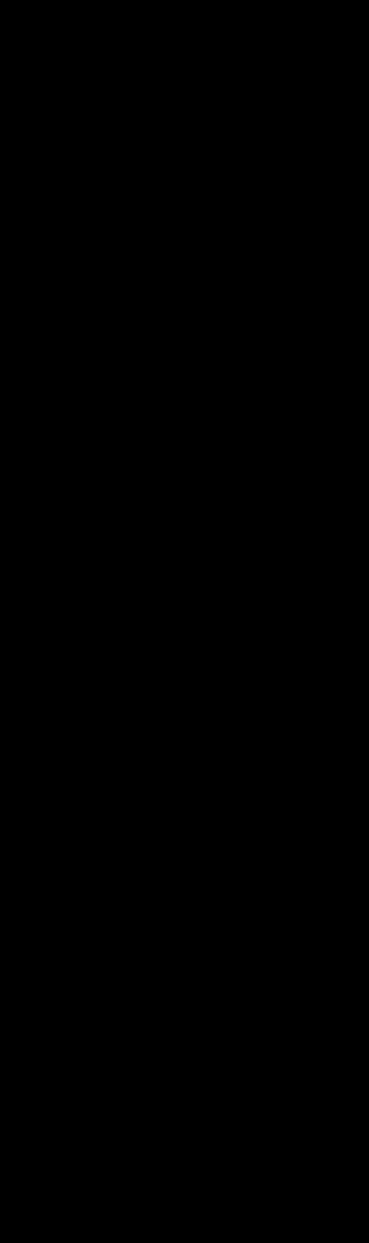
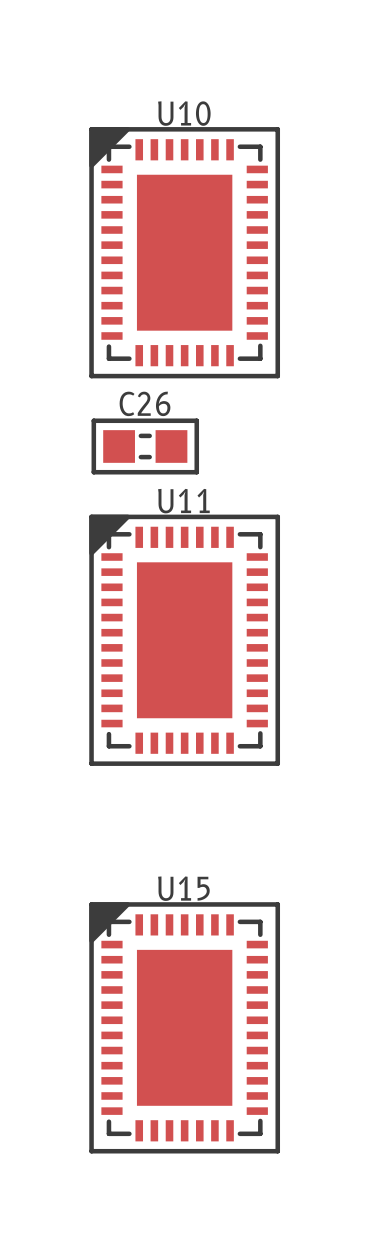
U10: none -> (184, 252)
C26: none -> (145, 446)
U11: none -> (184, 640)
U15: none -> (184, 1027)

